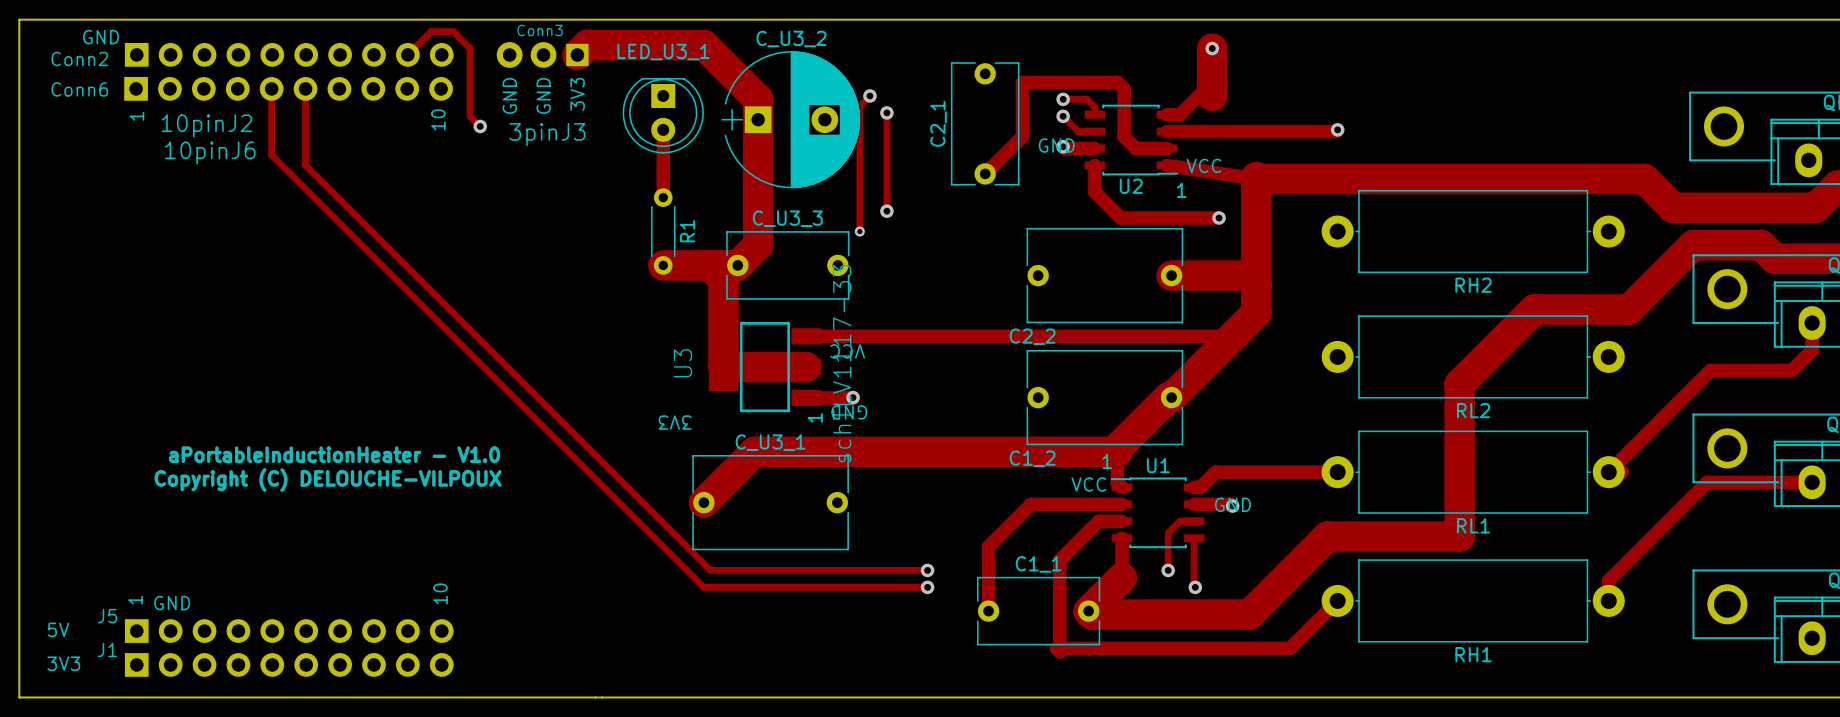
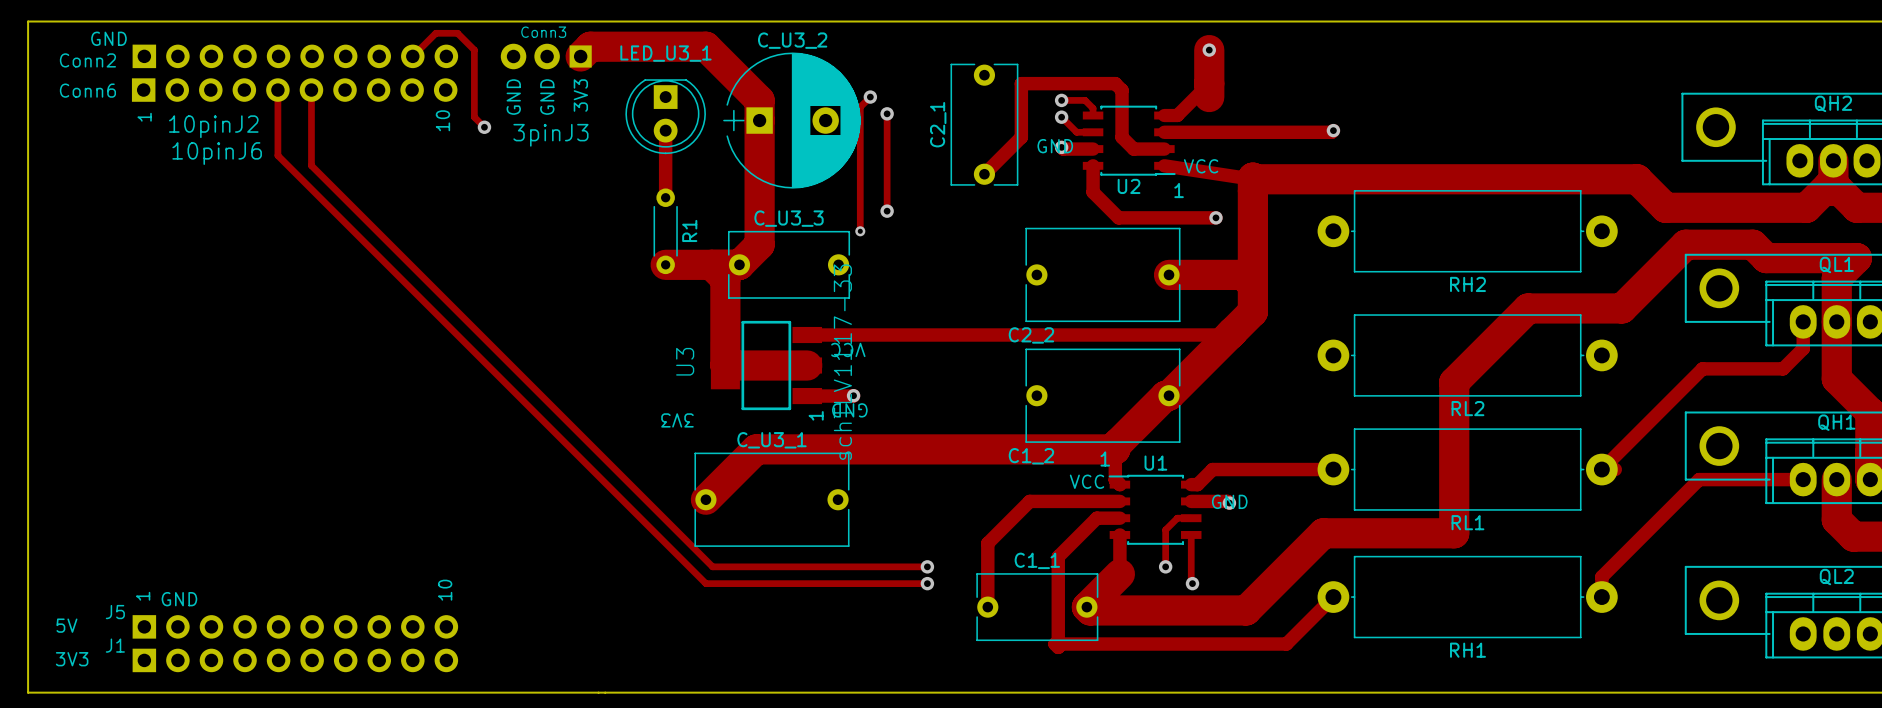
text: aPortableInductionHeater - V1.0 (334, 454) -> none
text: Copyright (C) DELOUCHE-VILPOUX (328, 480) -> none

